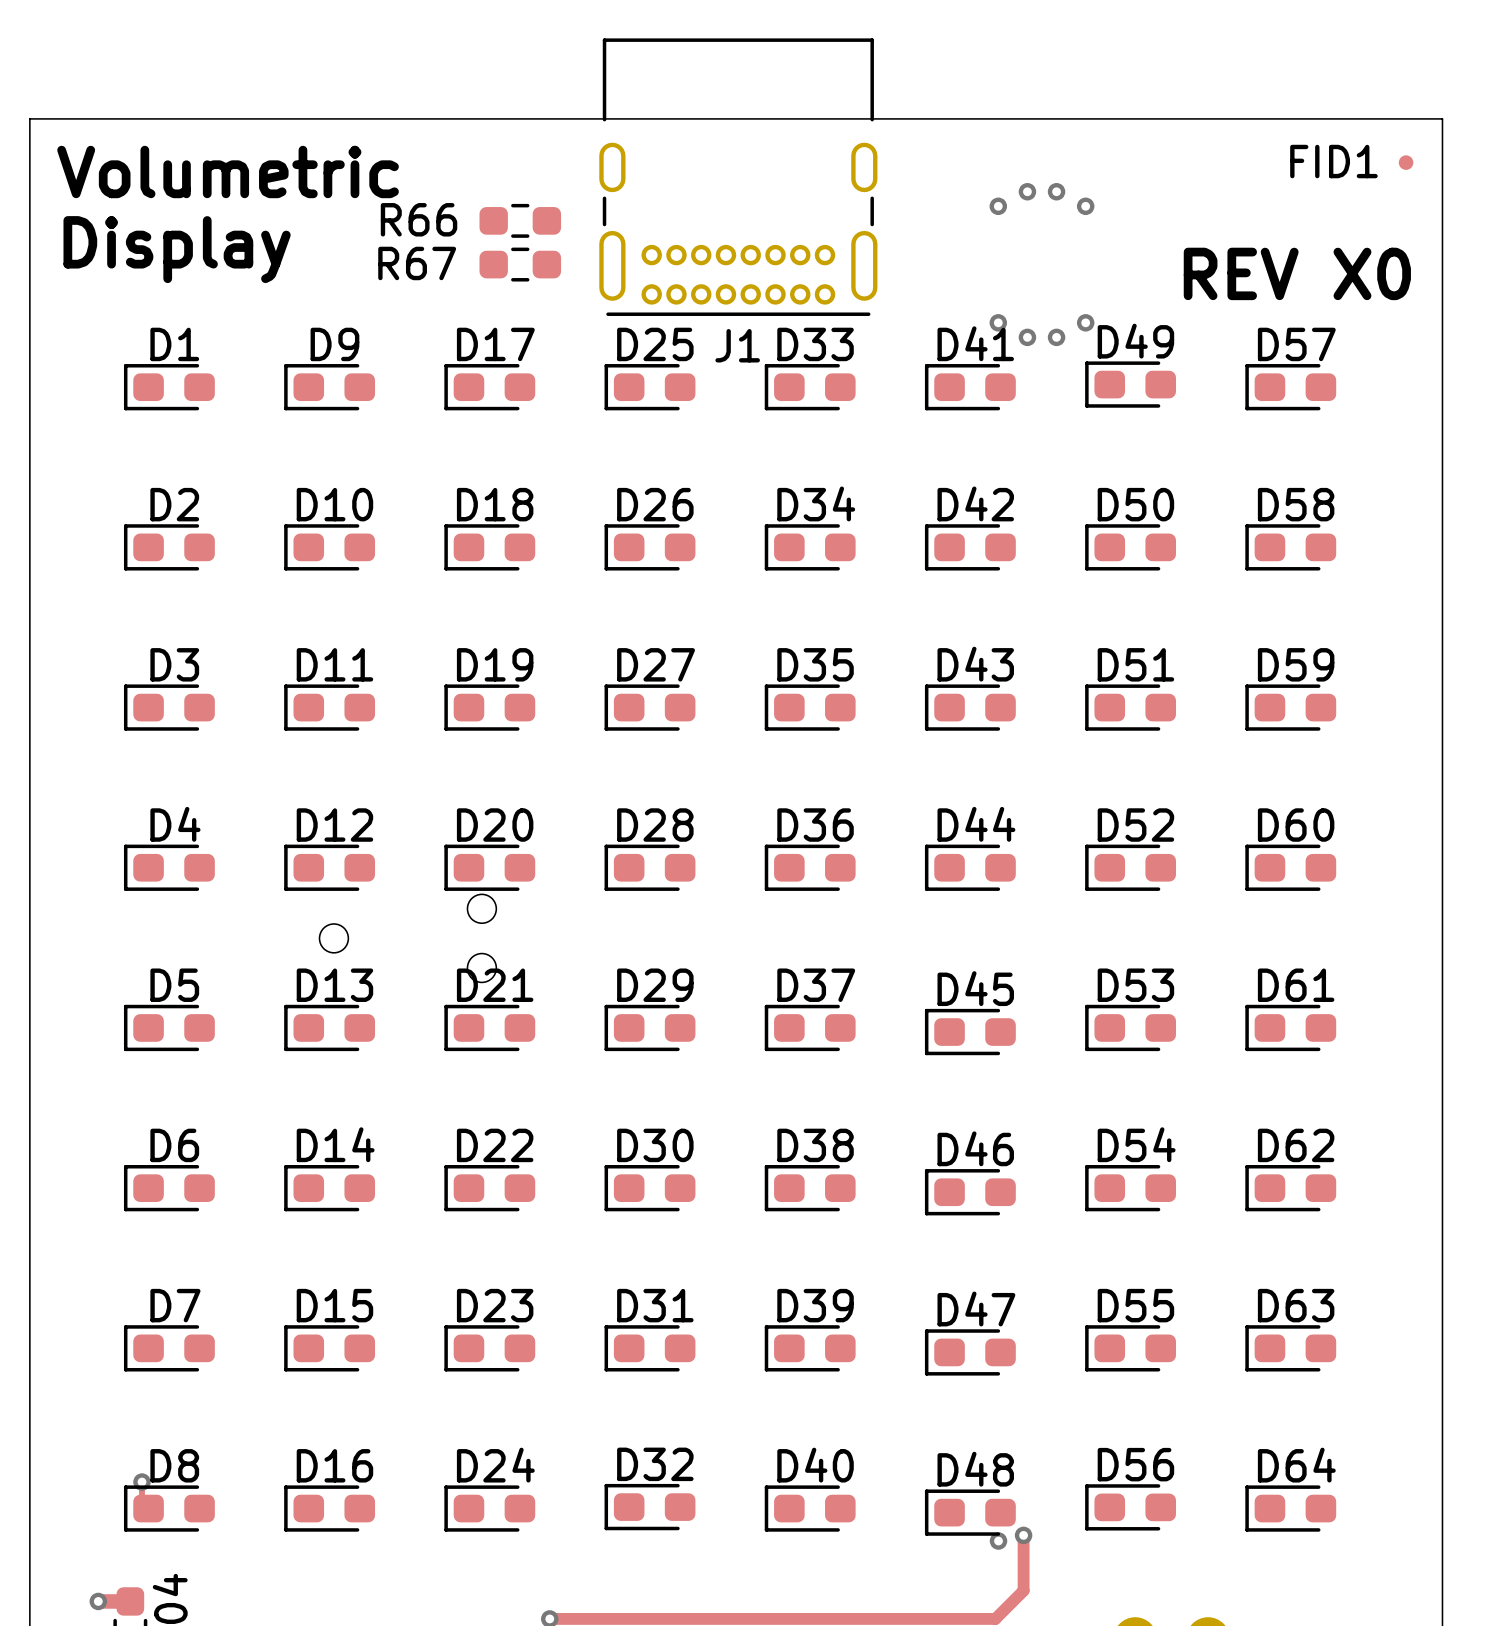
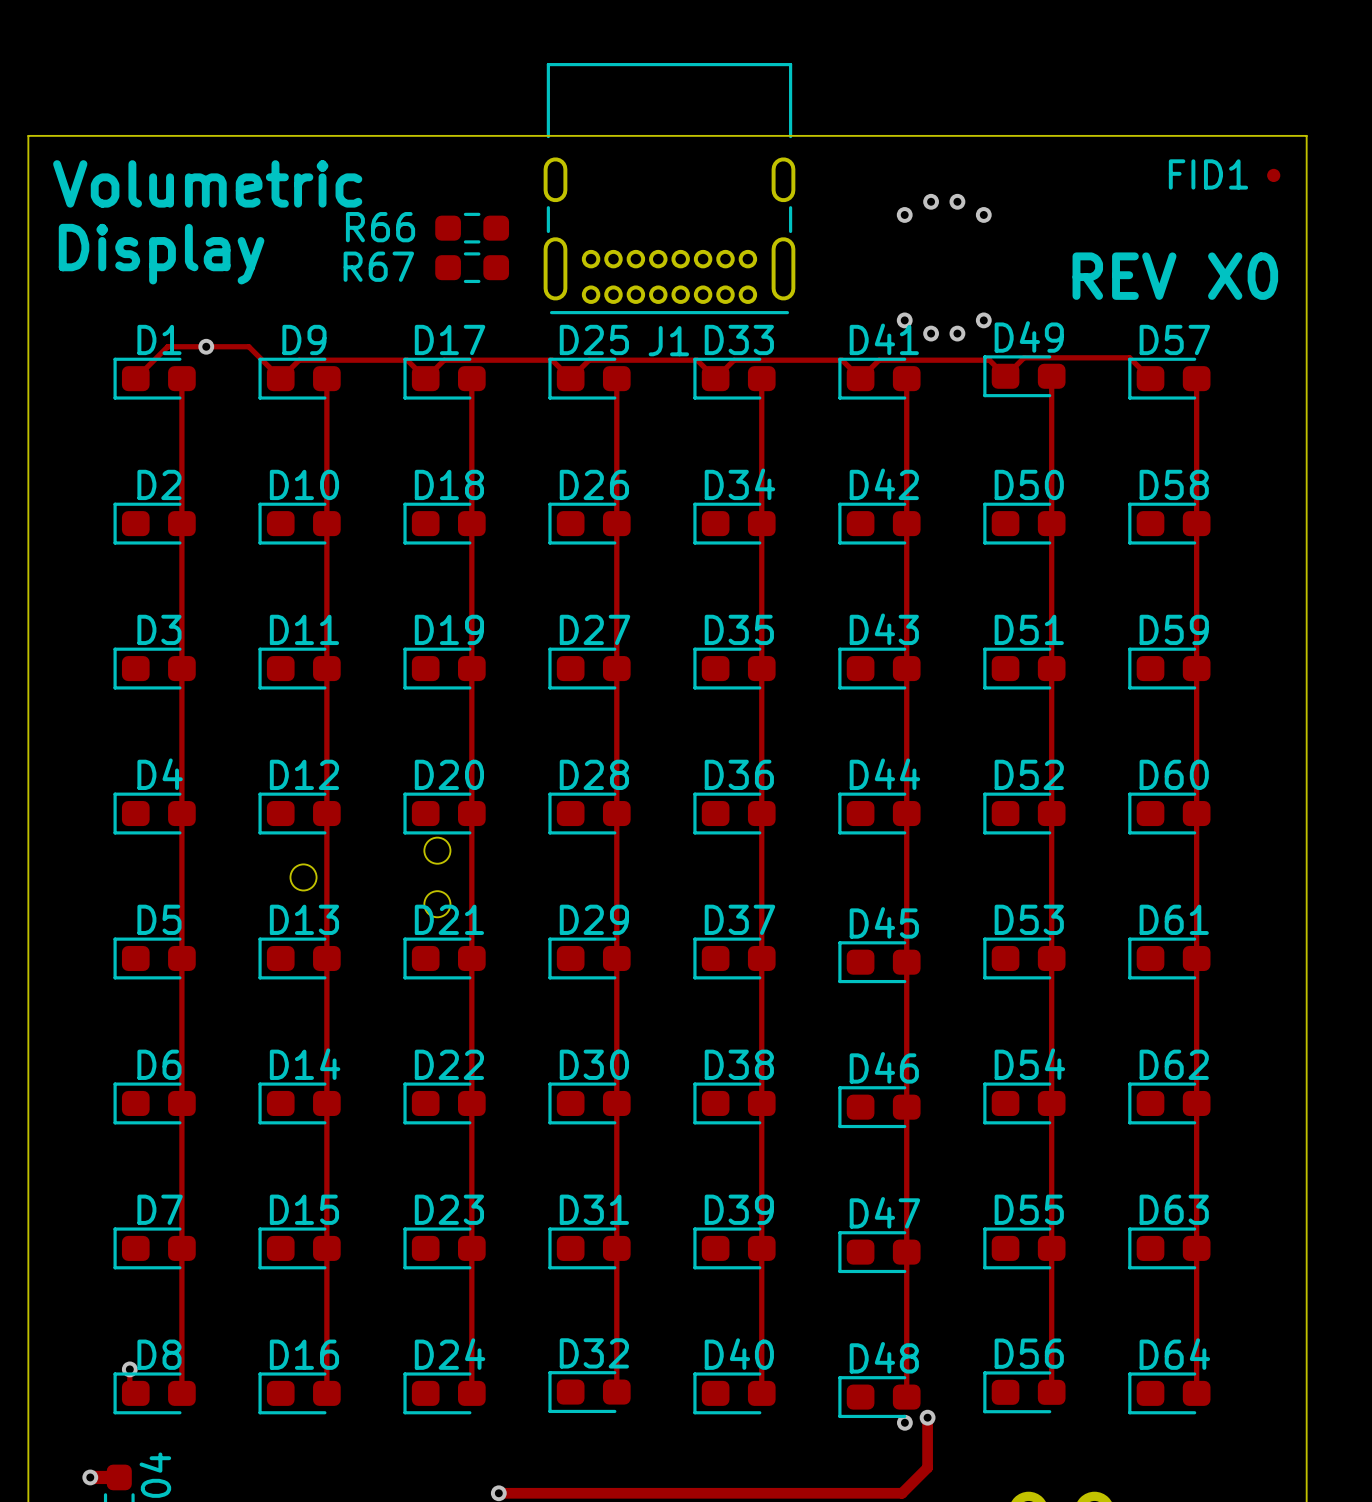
via: none -> (206, 346)
track: none -> (1051, 376) (1051, 1392)
track: none -> (135, 378) (167, 346) (248, 346) (280, 378) (299, 360) (407, 360) (425, 378) (444, 360) (552, 360) (570, 378) (589, 360) (697, 360) (715, 378) (734, 360) (842, 360) (860, 378) (879, 360) (989, 360) (1005, 376) (1024, 357) (1129, 357) (1150, 378)
track: none -> (181, 378) (181, 1393)
track: none -> (326, 378) (326, 1393)
track: none -> (471, 378) (471, 1393)
track: none -> (616, 378) (616, 1392)
track: none -> (761, 378) (761, 1393)
track: none -> (906, 378) (906, 1397)
track: none -> (1196, 378) (1196, 1393)

